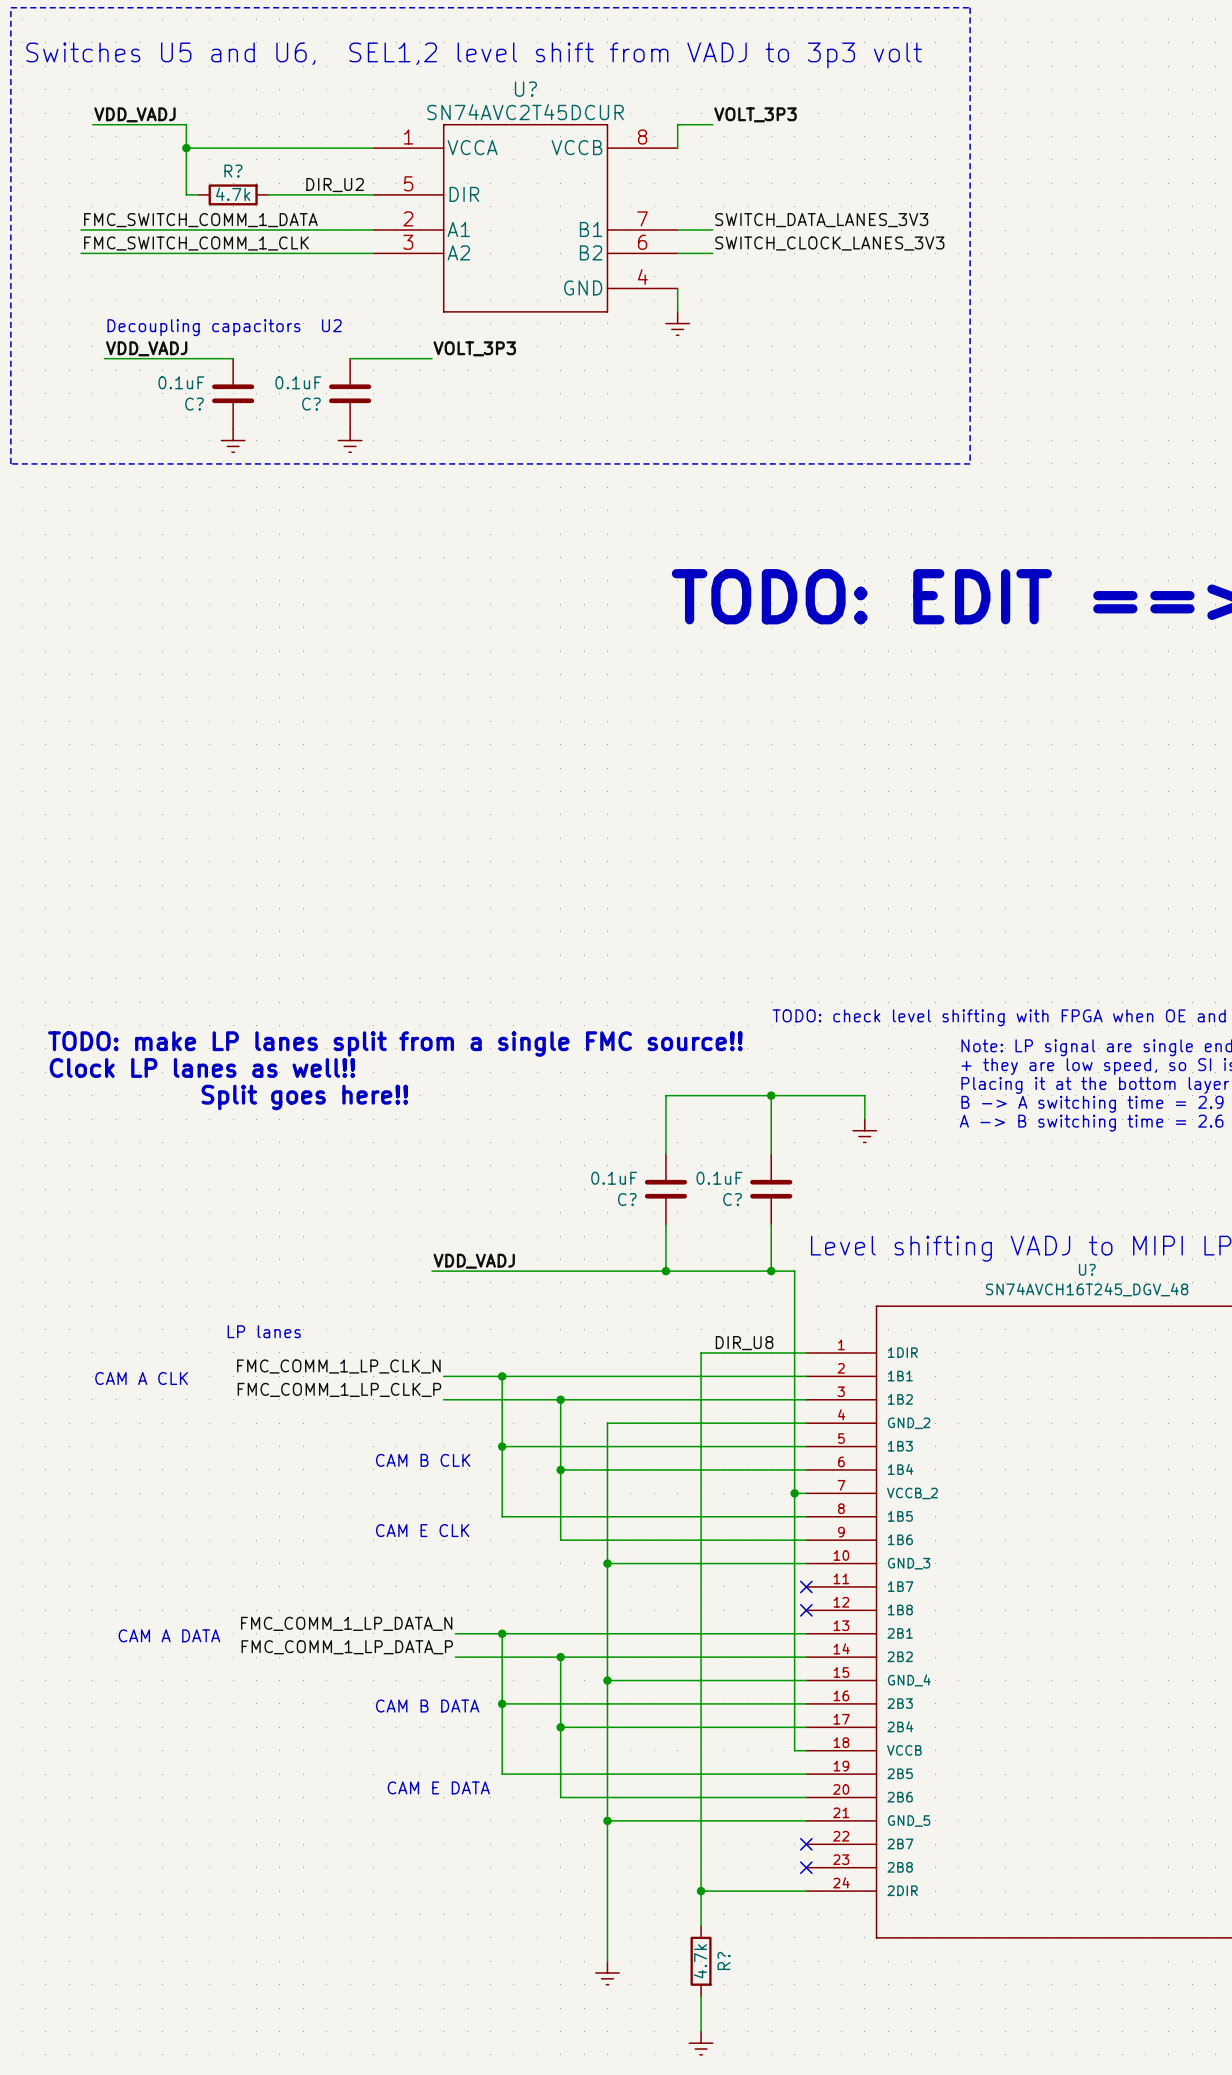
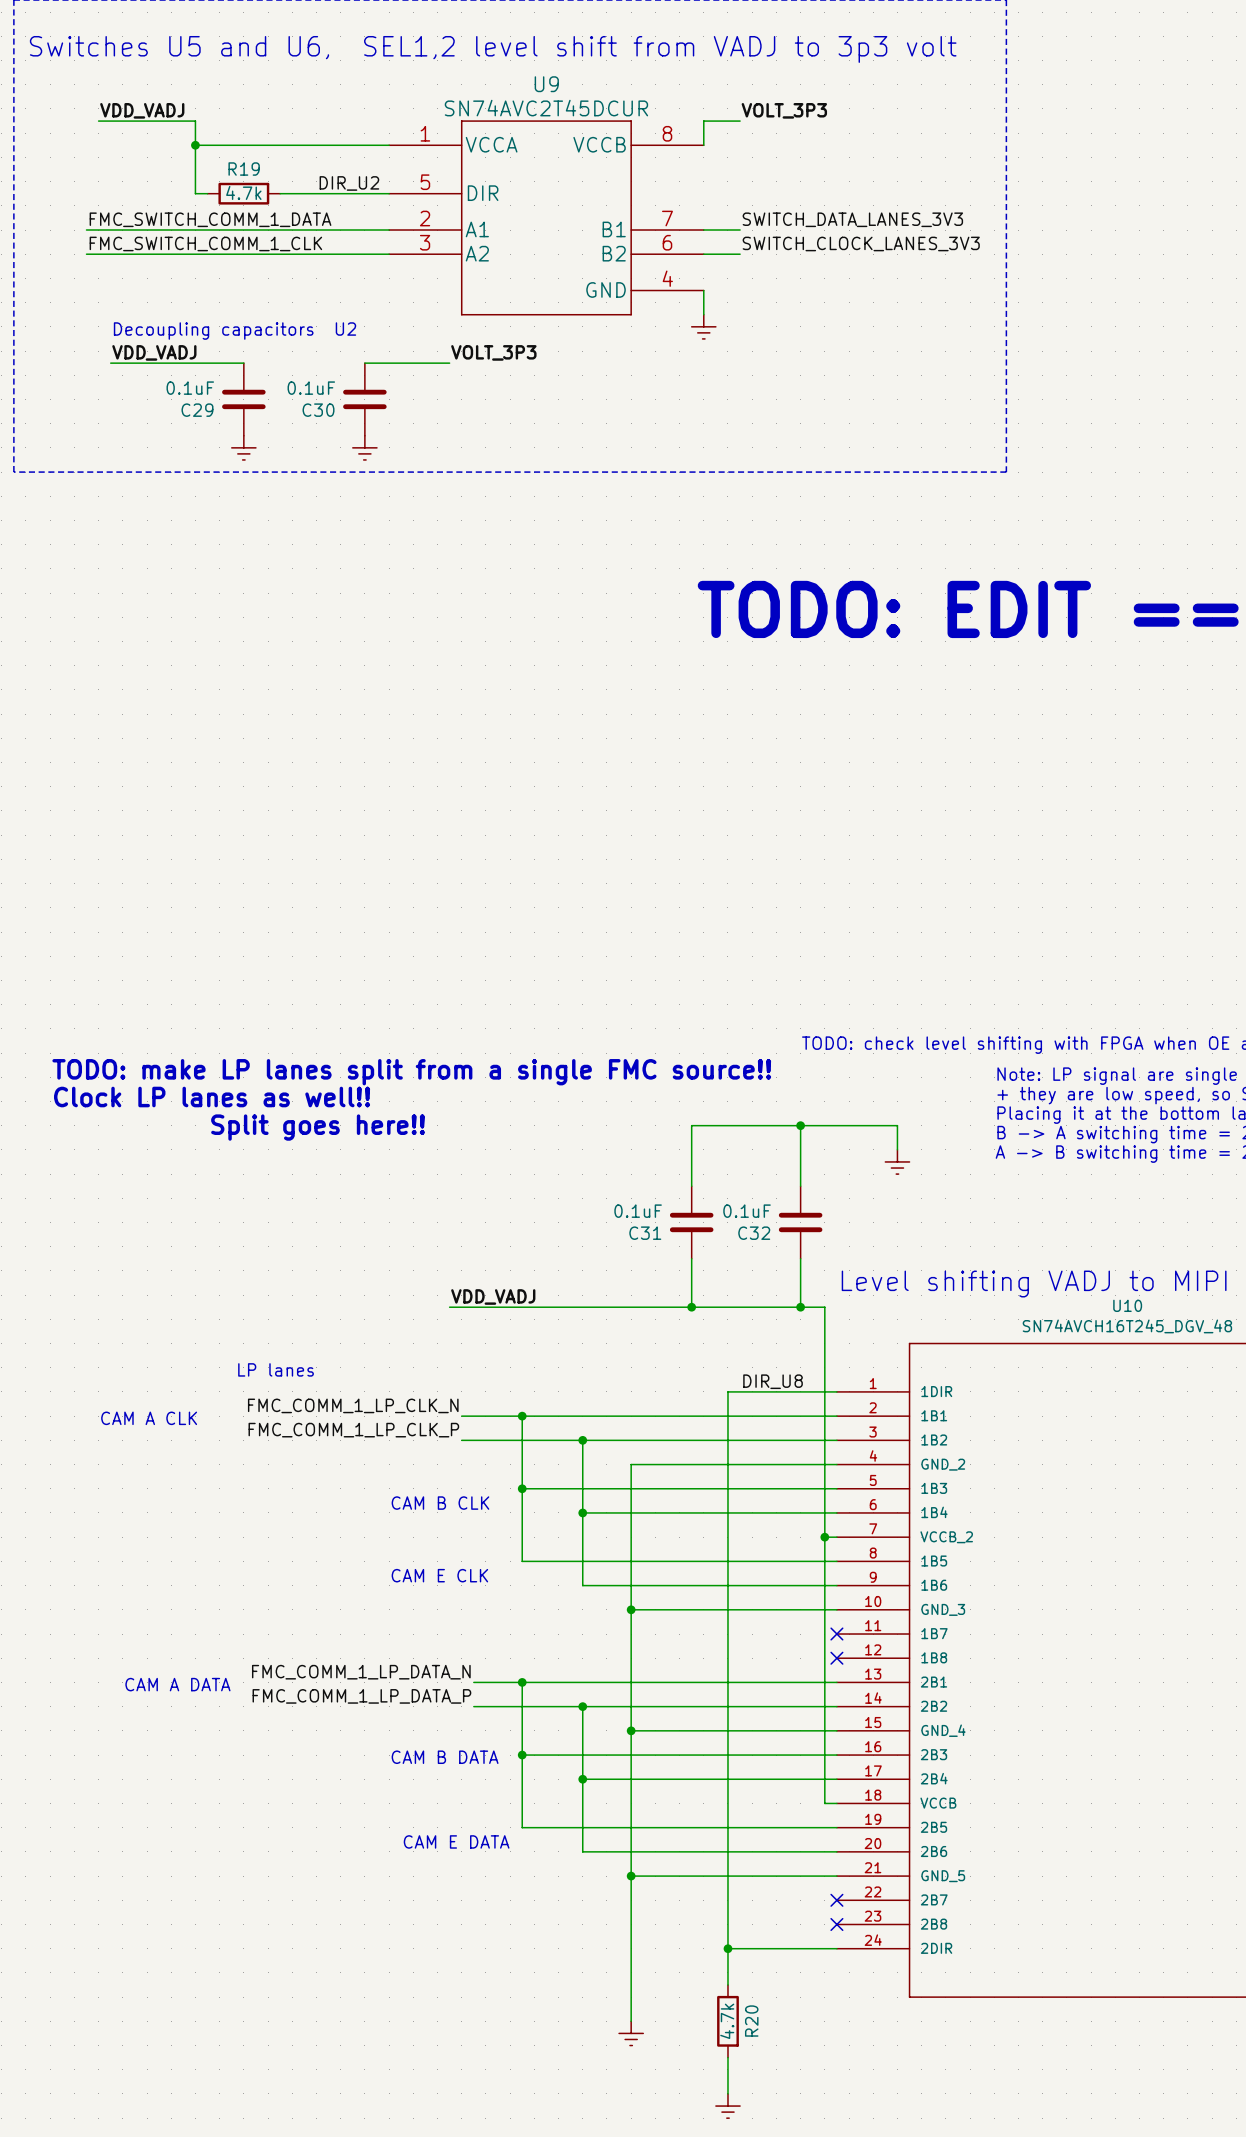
U? name: U? (525, 89) -> U9 (546, 84)
R? name: R? (233, 171) -> R19 (244, 169)
C? name: C? (194, 404) -> C29 (197, 410)
C? name: C? (311, 404) -> C30 (318, 410)
C? name: C? (627, 1199) -> C31 (645, 1233)
C? name: C? (732, 1199) -> C32 (754, 1233)
U? name: U? (1087, 1269) -> U10 (1127, 1305)
R? name: R? (724, 1961) -> R20 (751, 2021)

